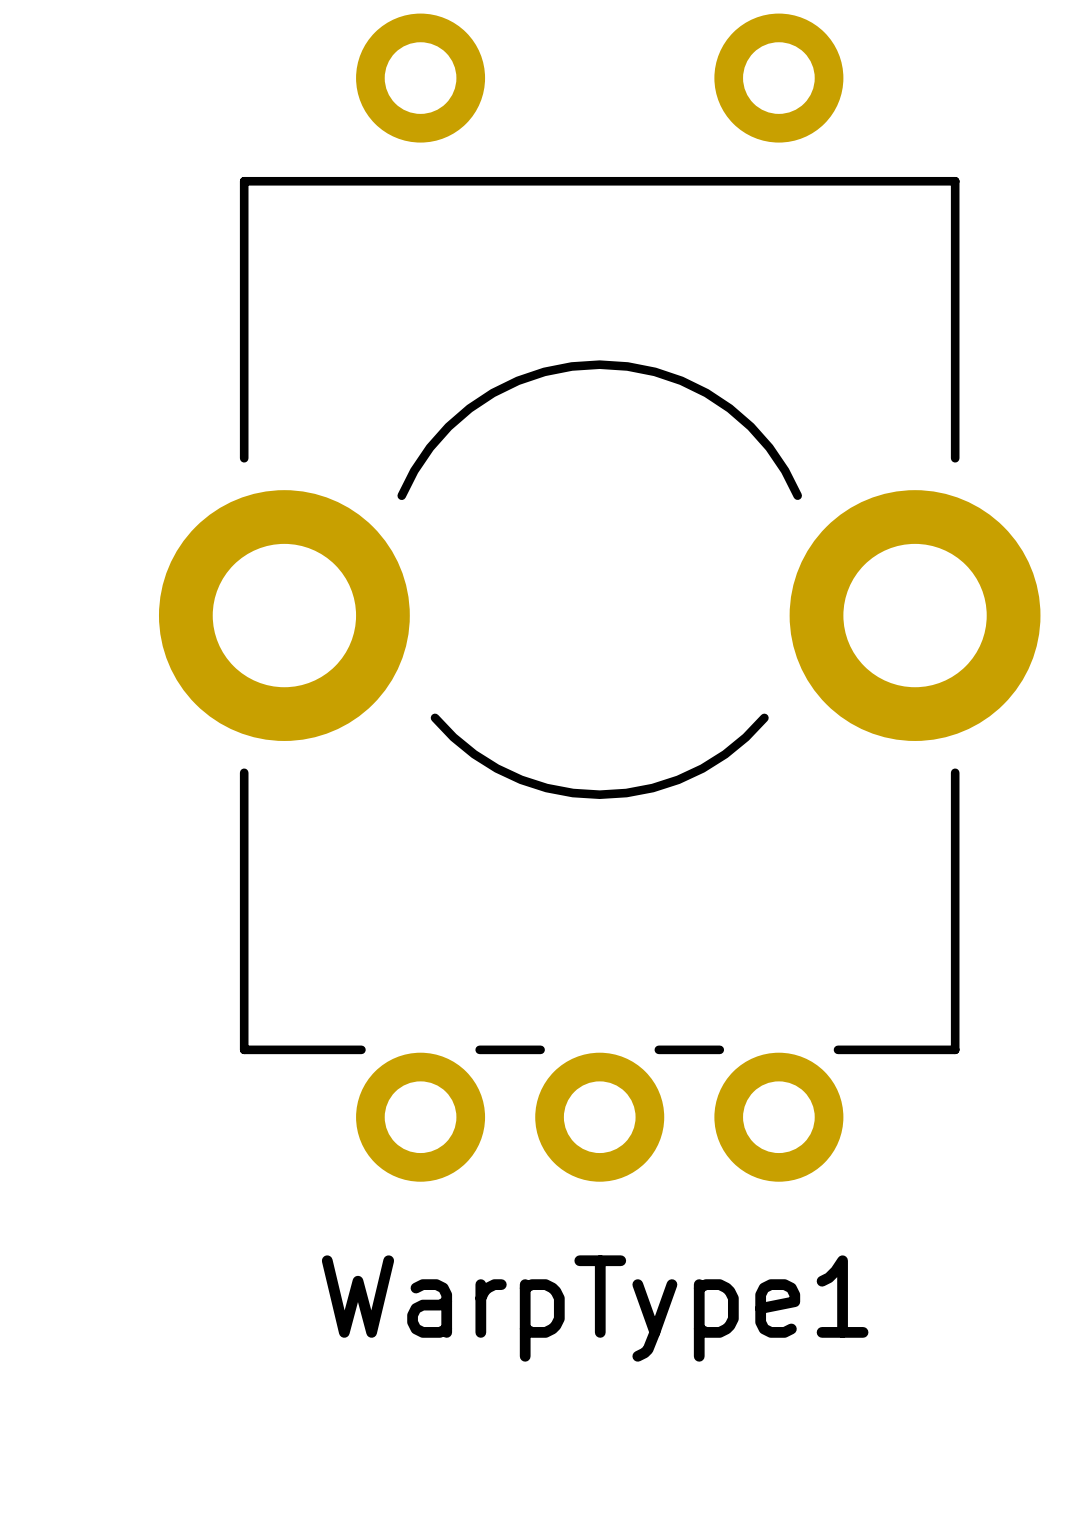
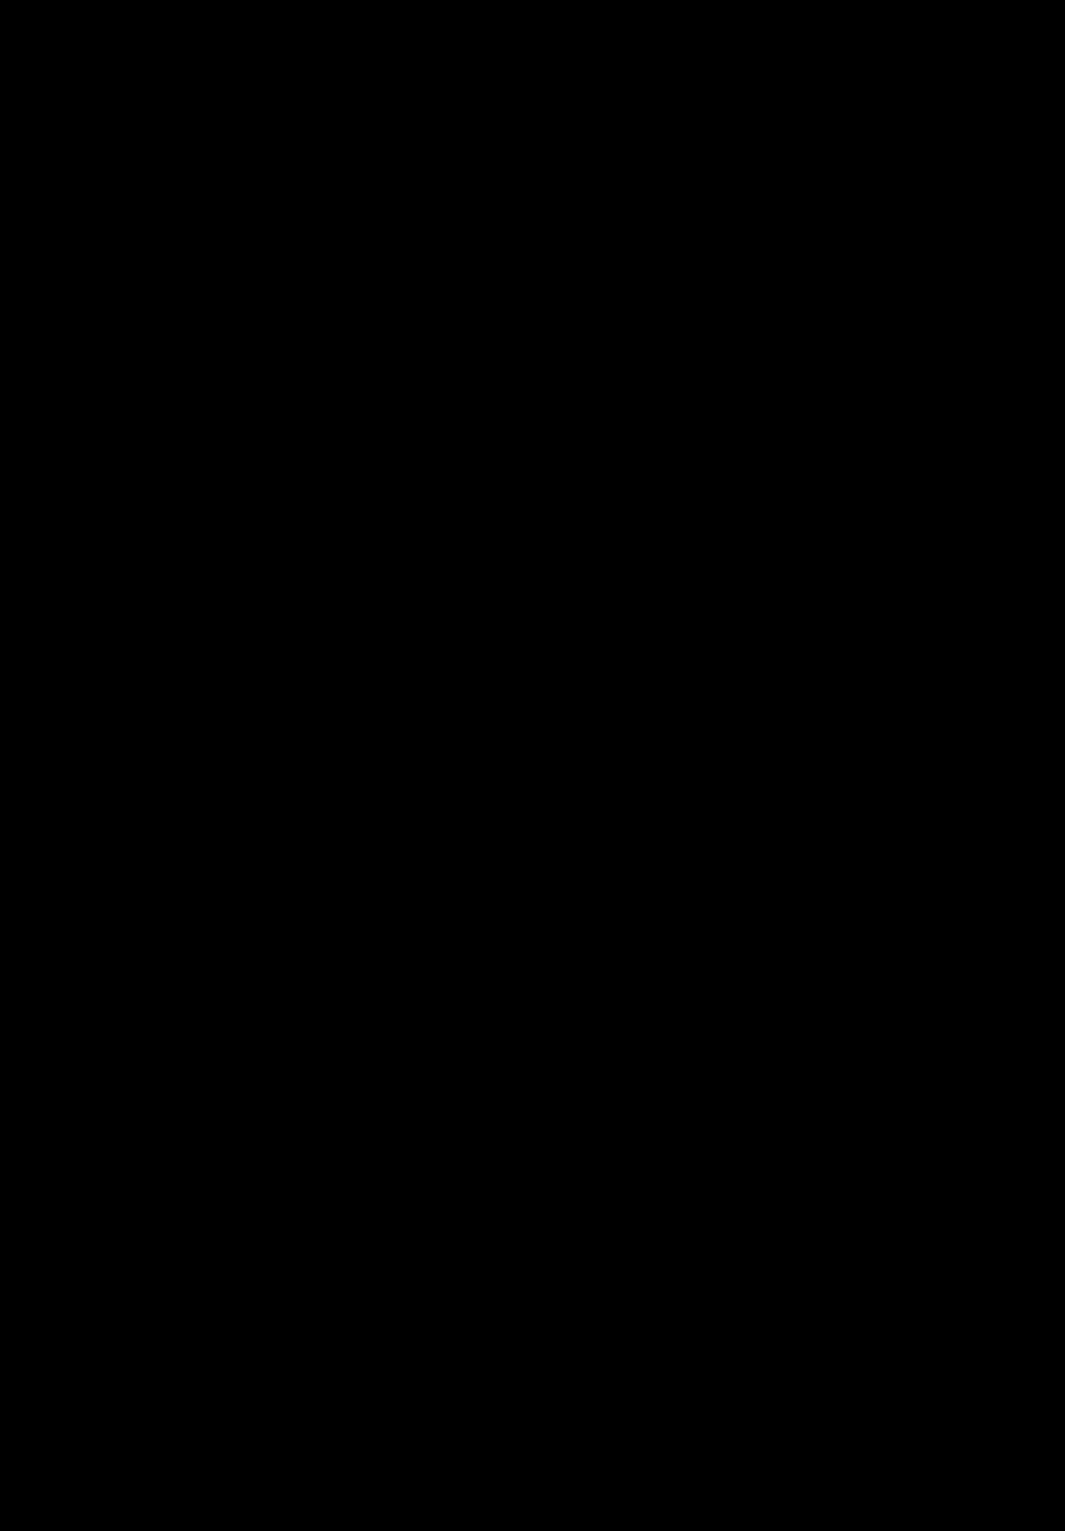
WarpType1: (599, 597) -> none

